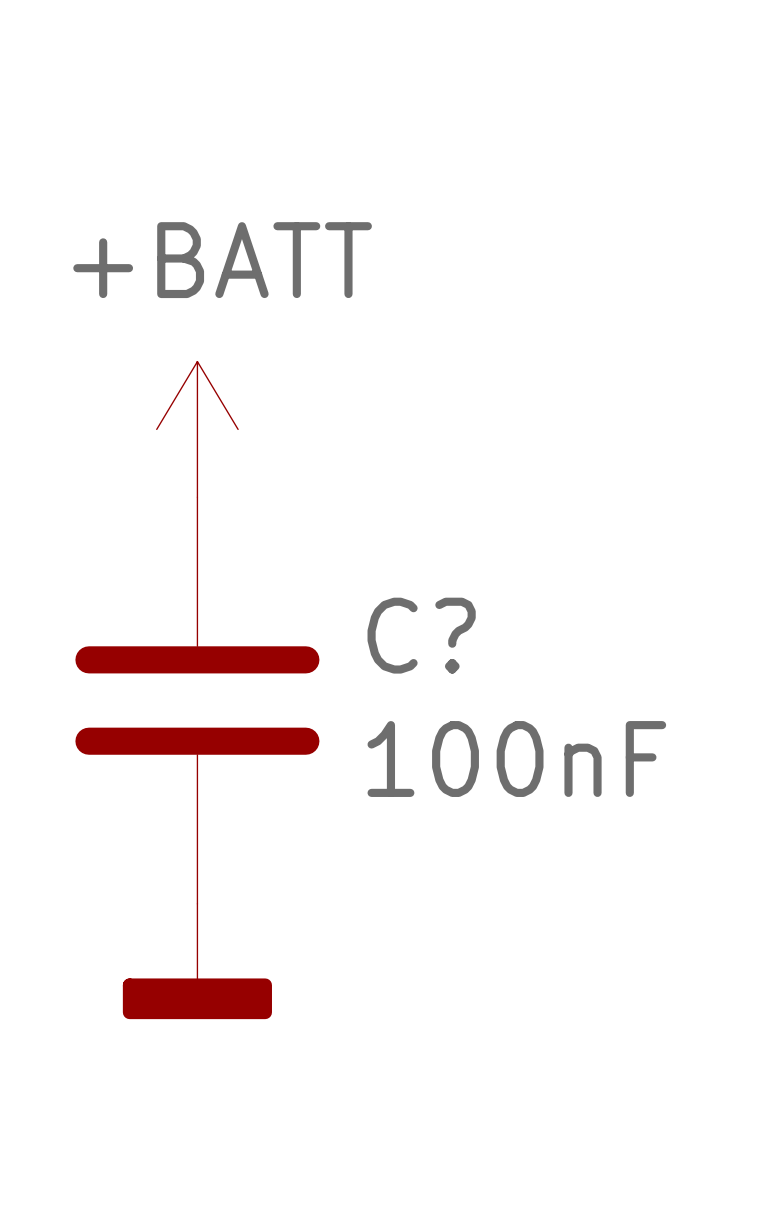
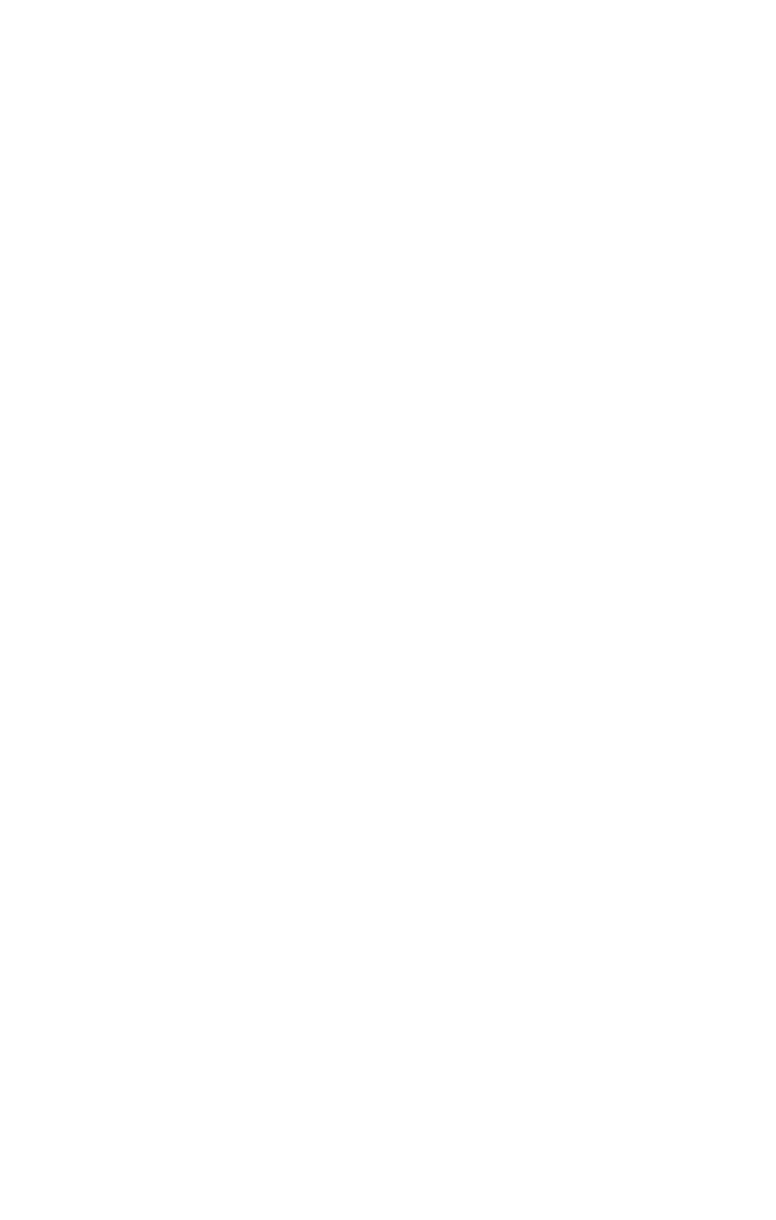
power symbol: +BATT (197, 429) -> none
C?: (197, 700) -> none
power symbol: (197, 961) -> none

